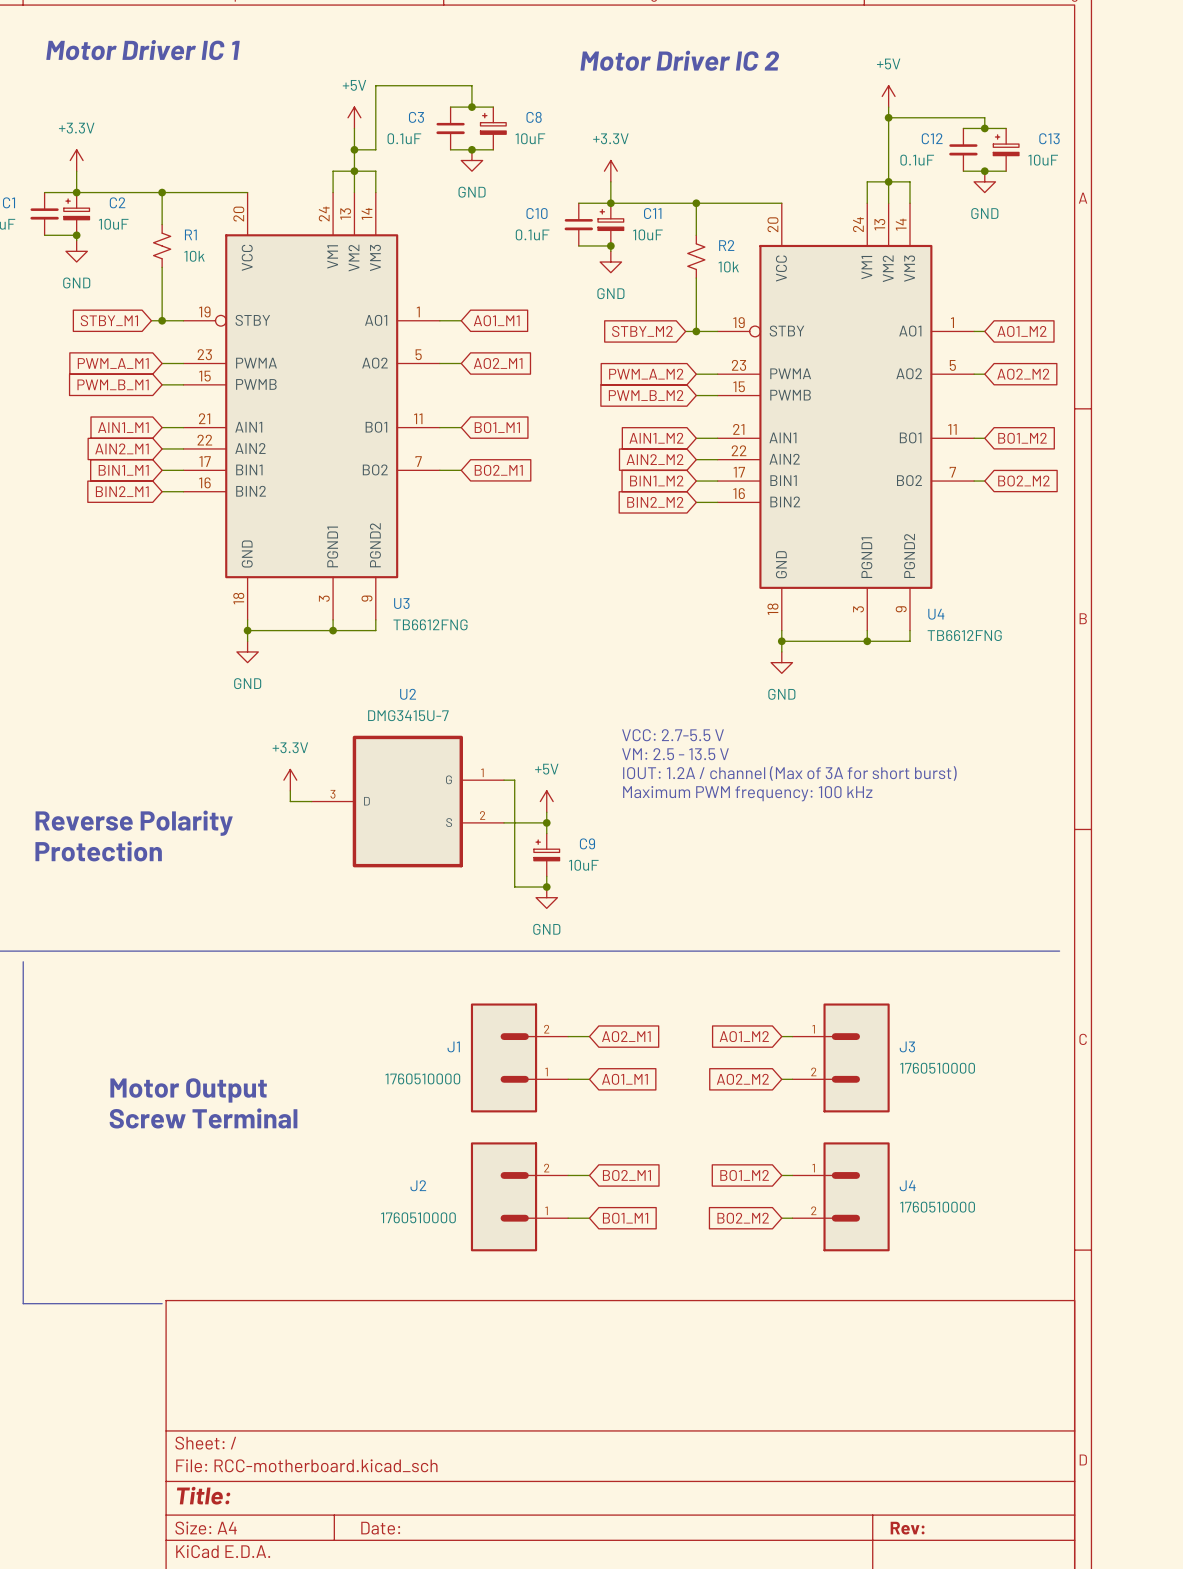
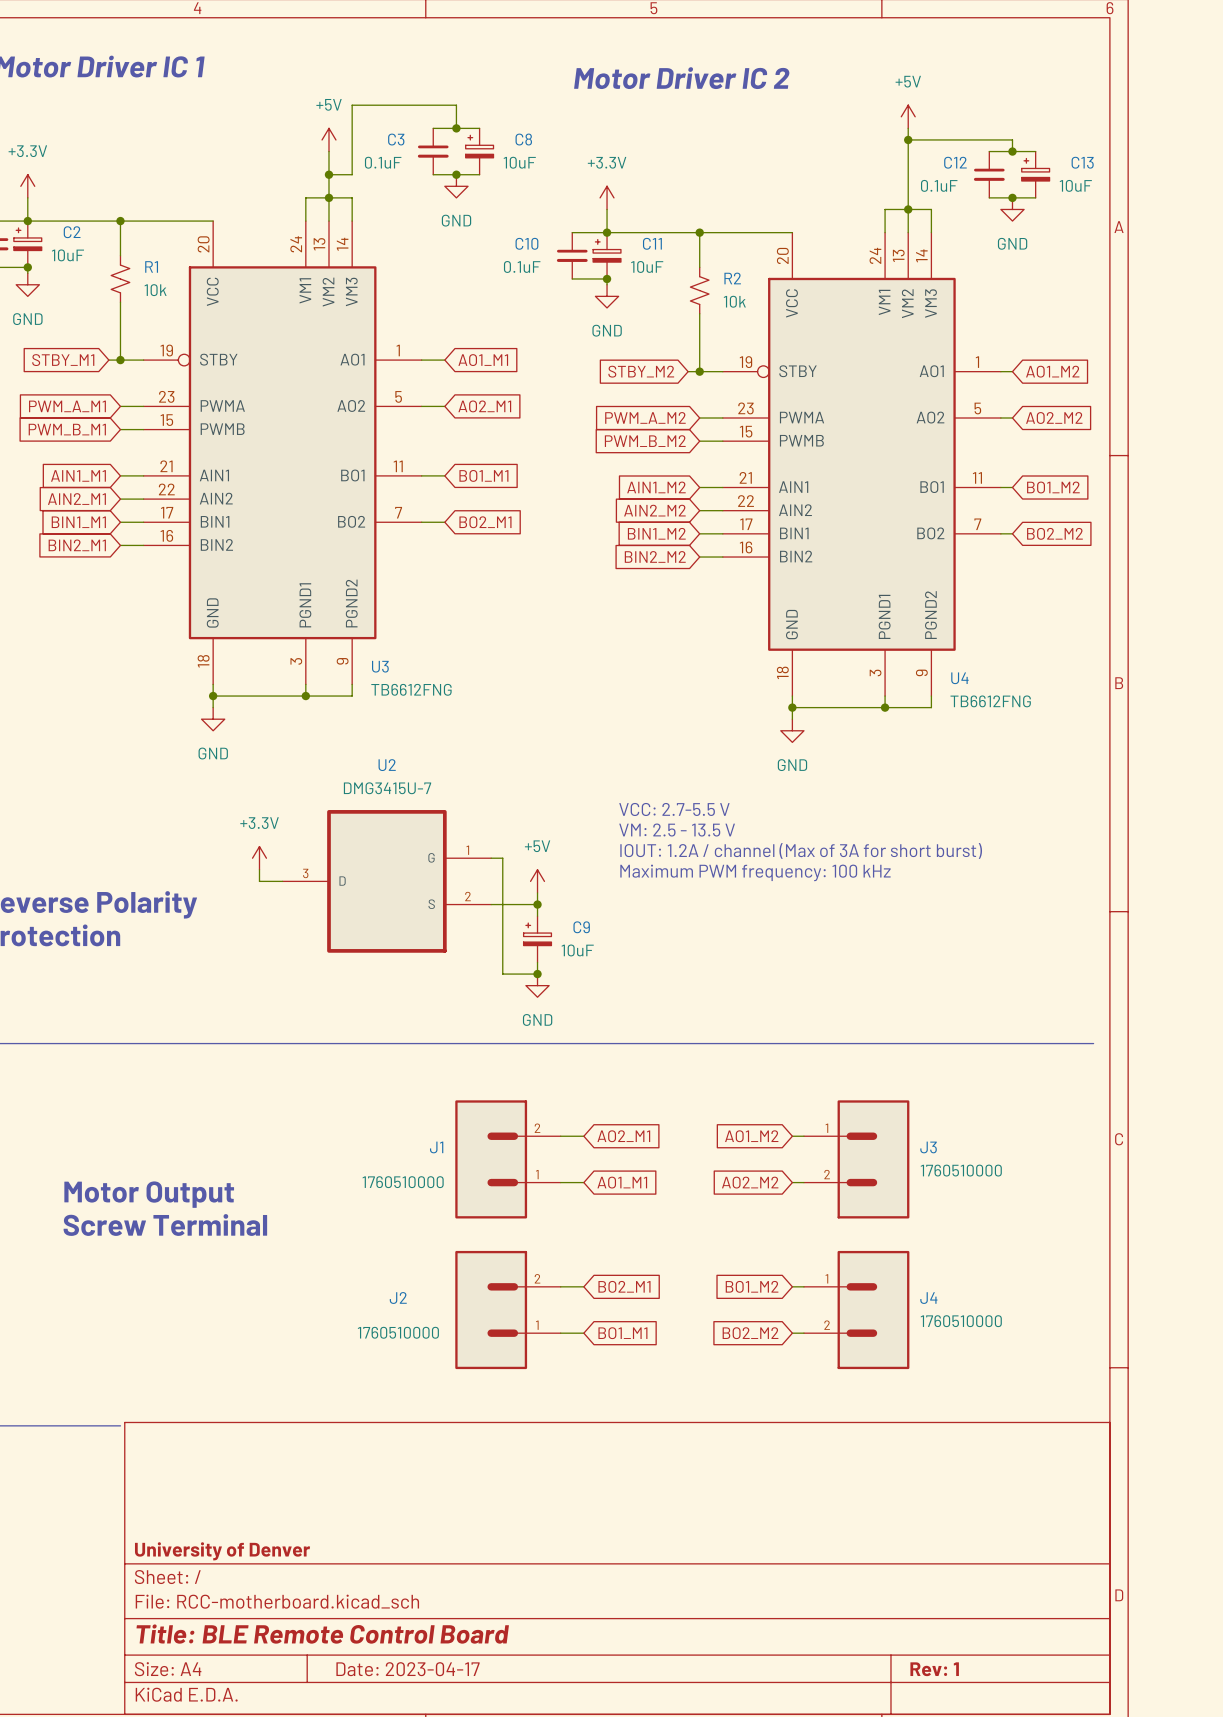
title block: none -> University of Denver (222, 1551)
title block: Title: (203, 1495) -> Title: BLE Remote Control Board (322, 1634)
title block: Date: (380, 1528) -> Date: 2023-04-17 (408, 1669)
title block: Rev: (907, 1528) -> Rev: 1 (934, 1669)

